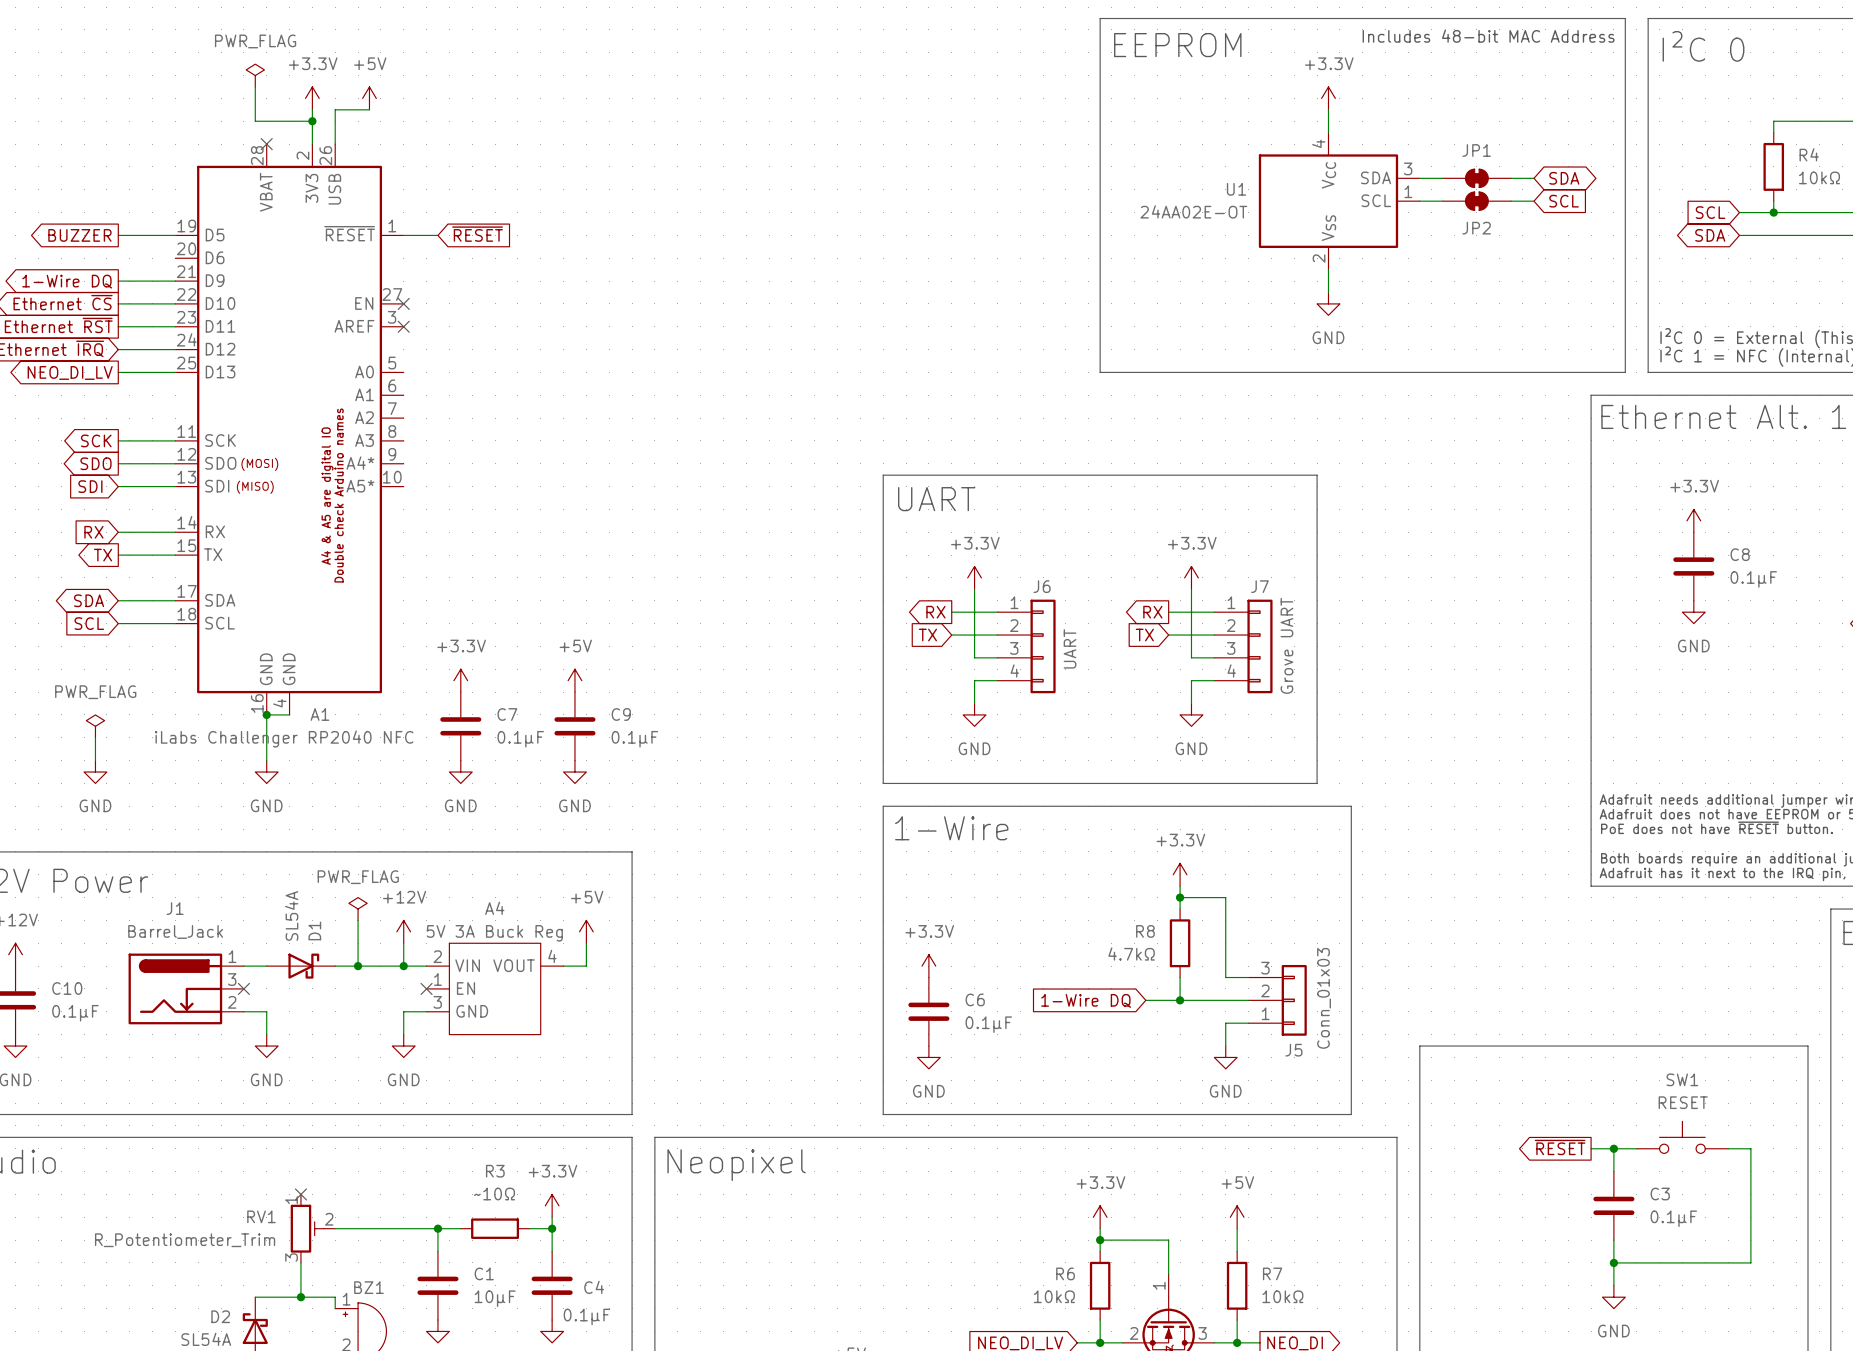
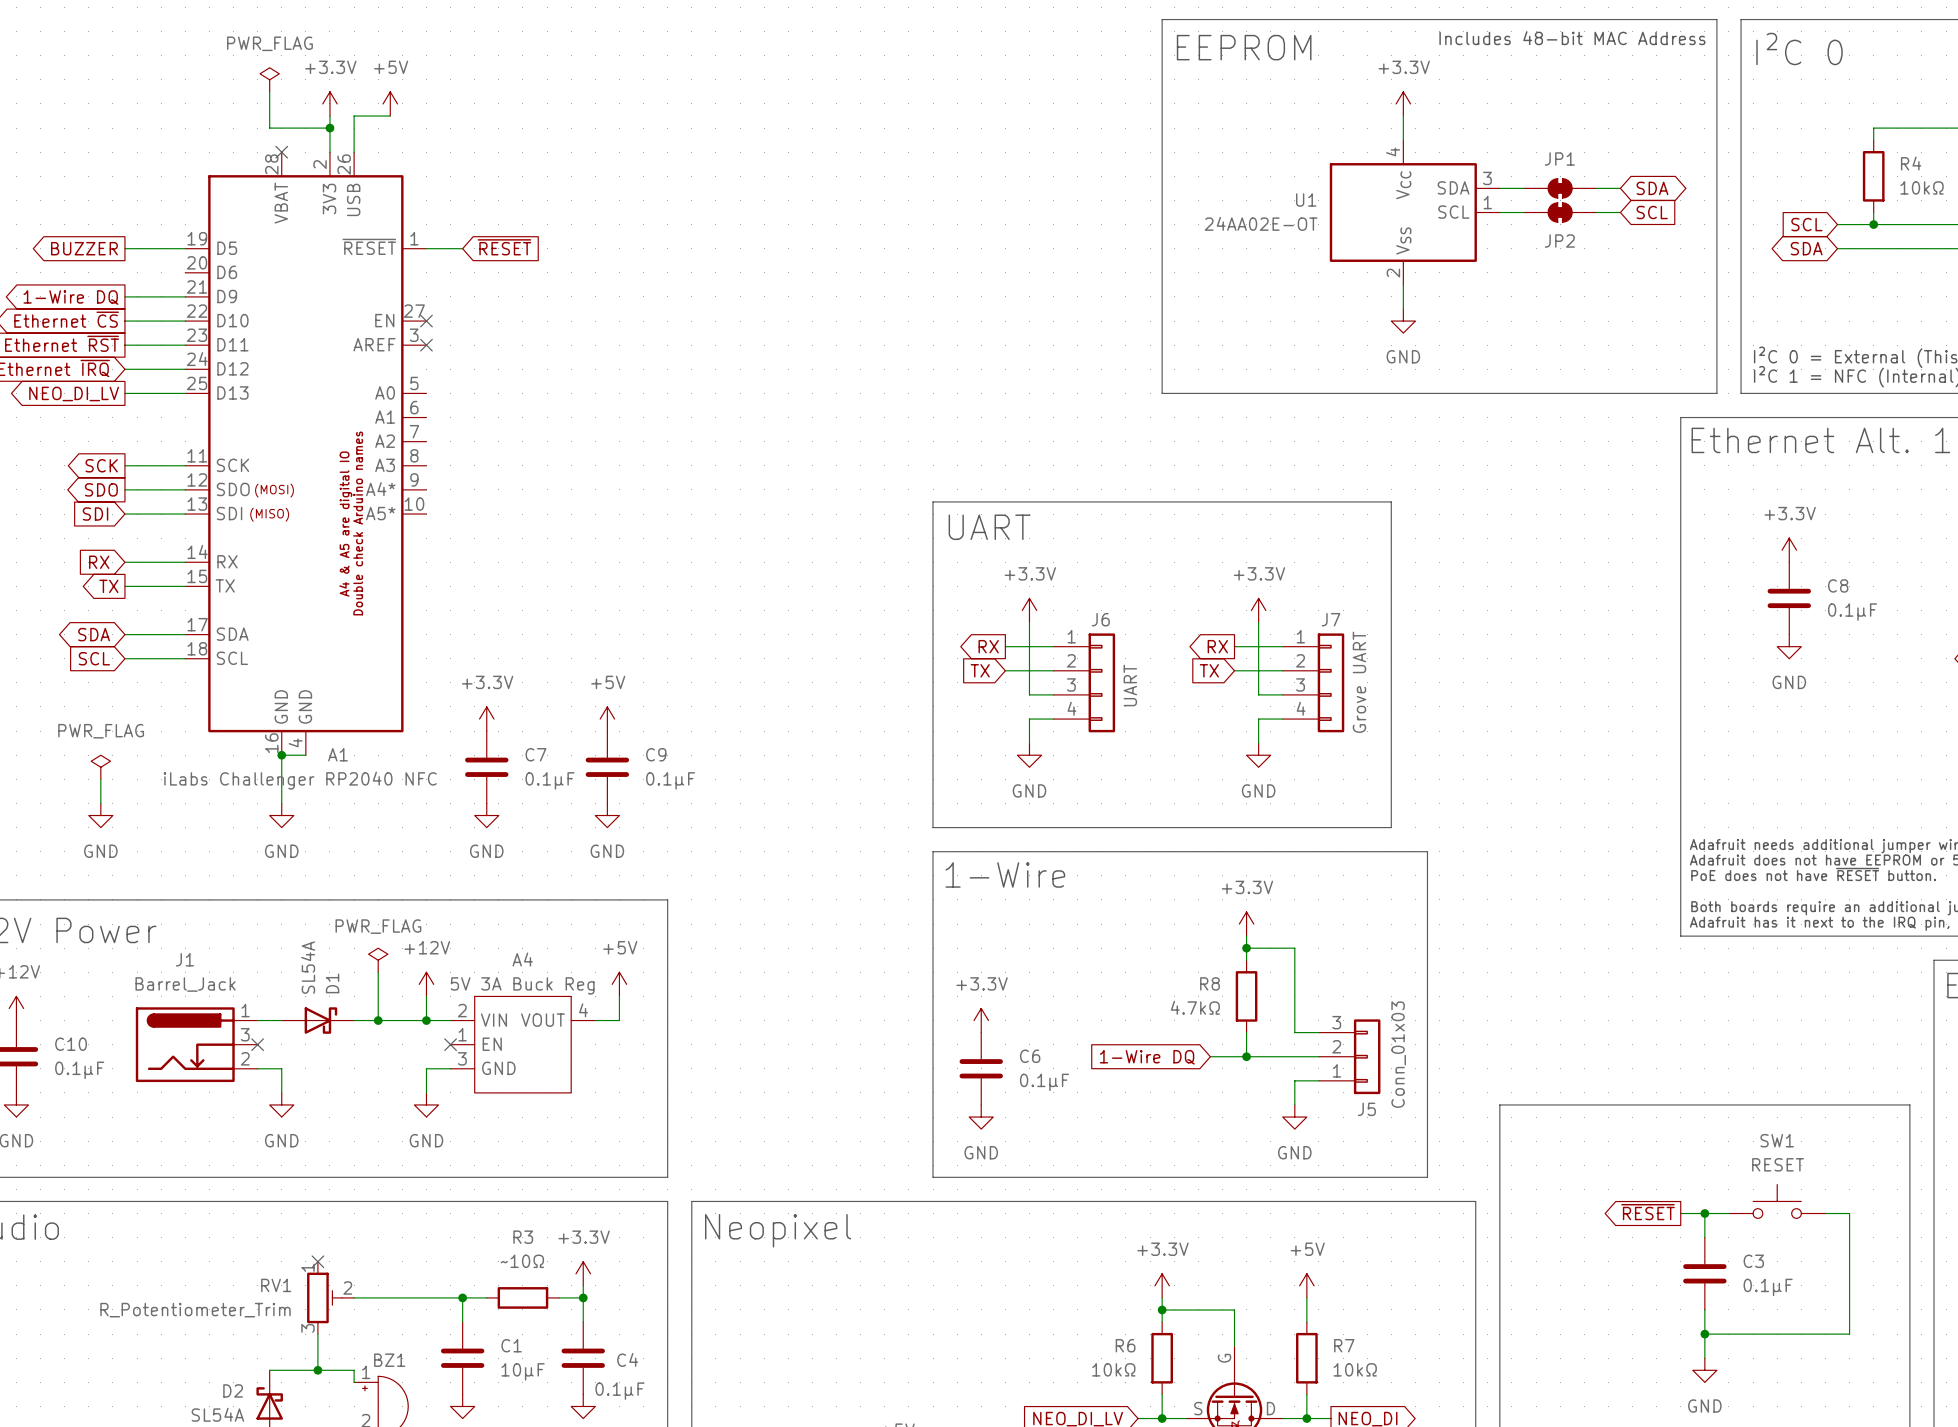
part pin name: none -> G (1224, 1358)
part pin number: 1 (1159, 1285) -> none
part pin name: none -> S (1198, 1408)
part pin number: 2 (1134, 1333) -> none
part pin number: 3 (1202, 1333) -> none
part pin name: none -> D (1270, 1408)

